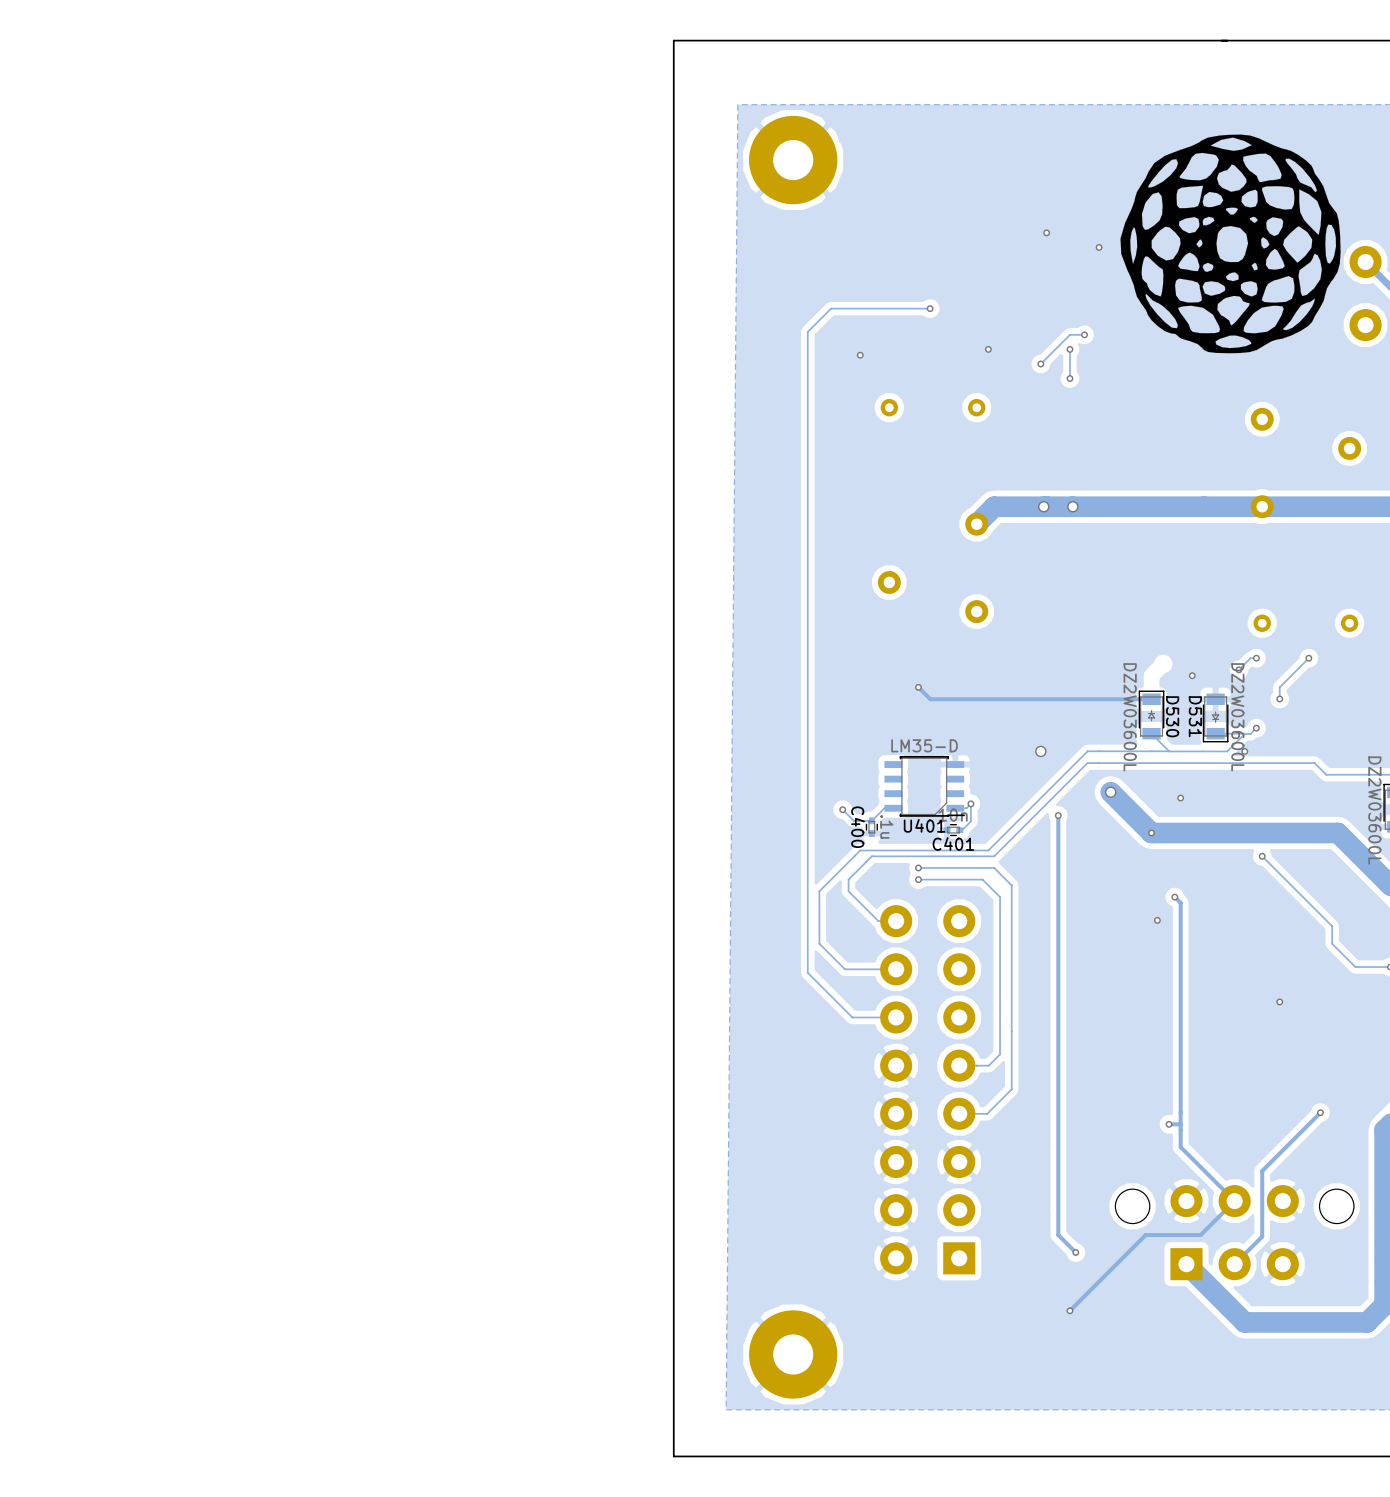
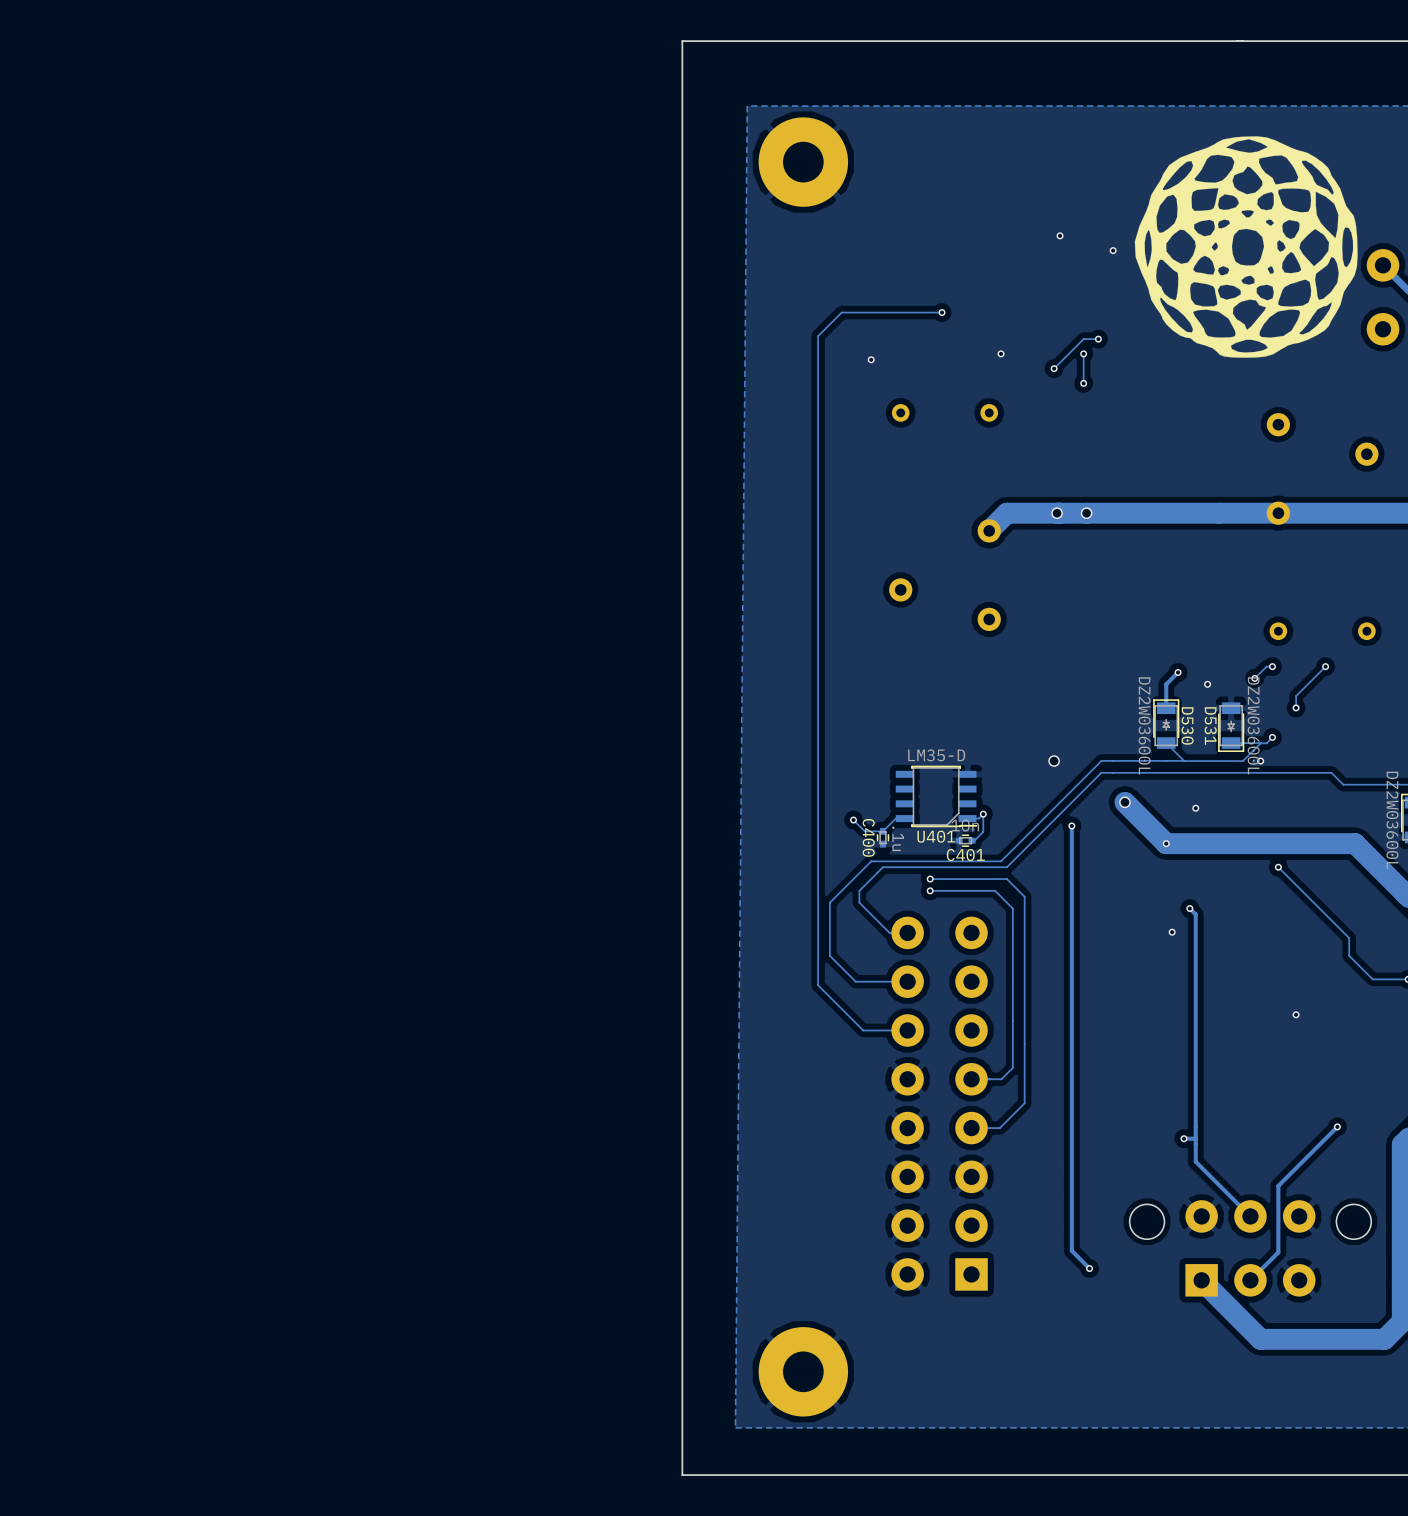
via: none -> (1178, 672)
track: (918, 687) (930, 699) (1151, 699) -> (1178, 672) (1166, 684) (1166, 708)
via: (918, 687) -> none
track: (1234, 1201) (1200, 1235) (1145, 1235) (1069, 1310) -> none
via: (1069, 1310) -> none

